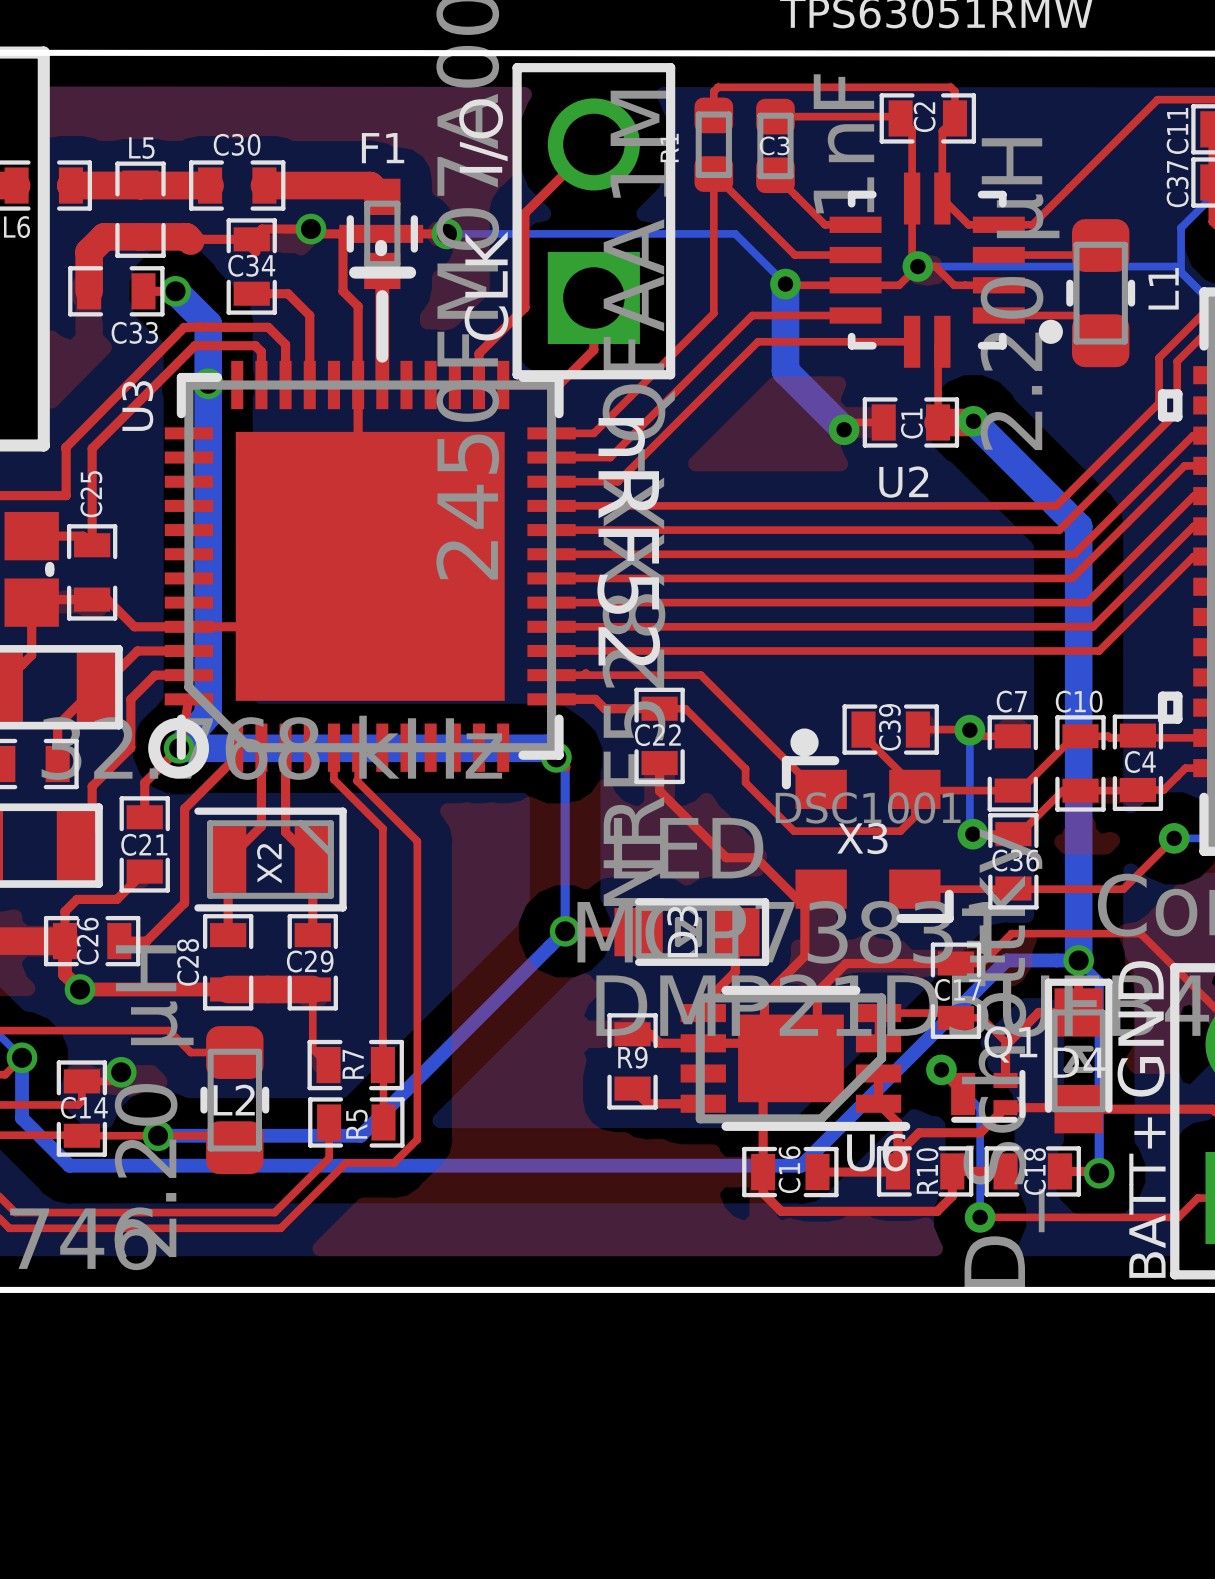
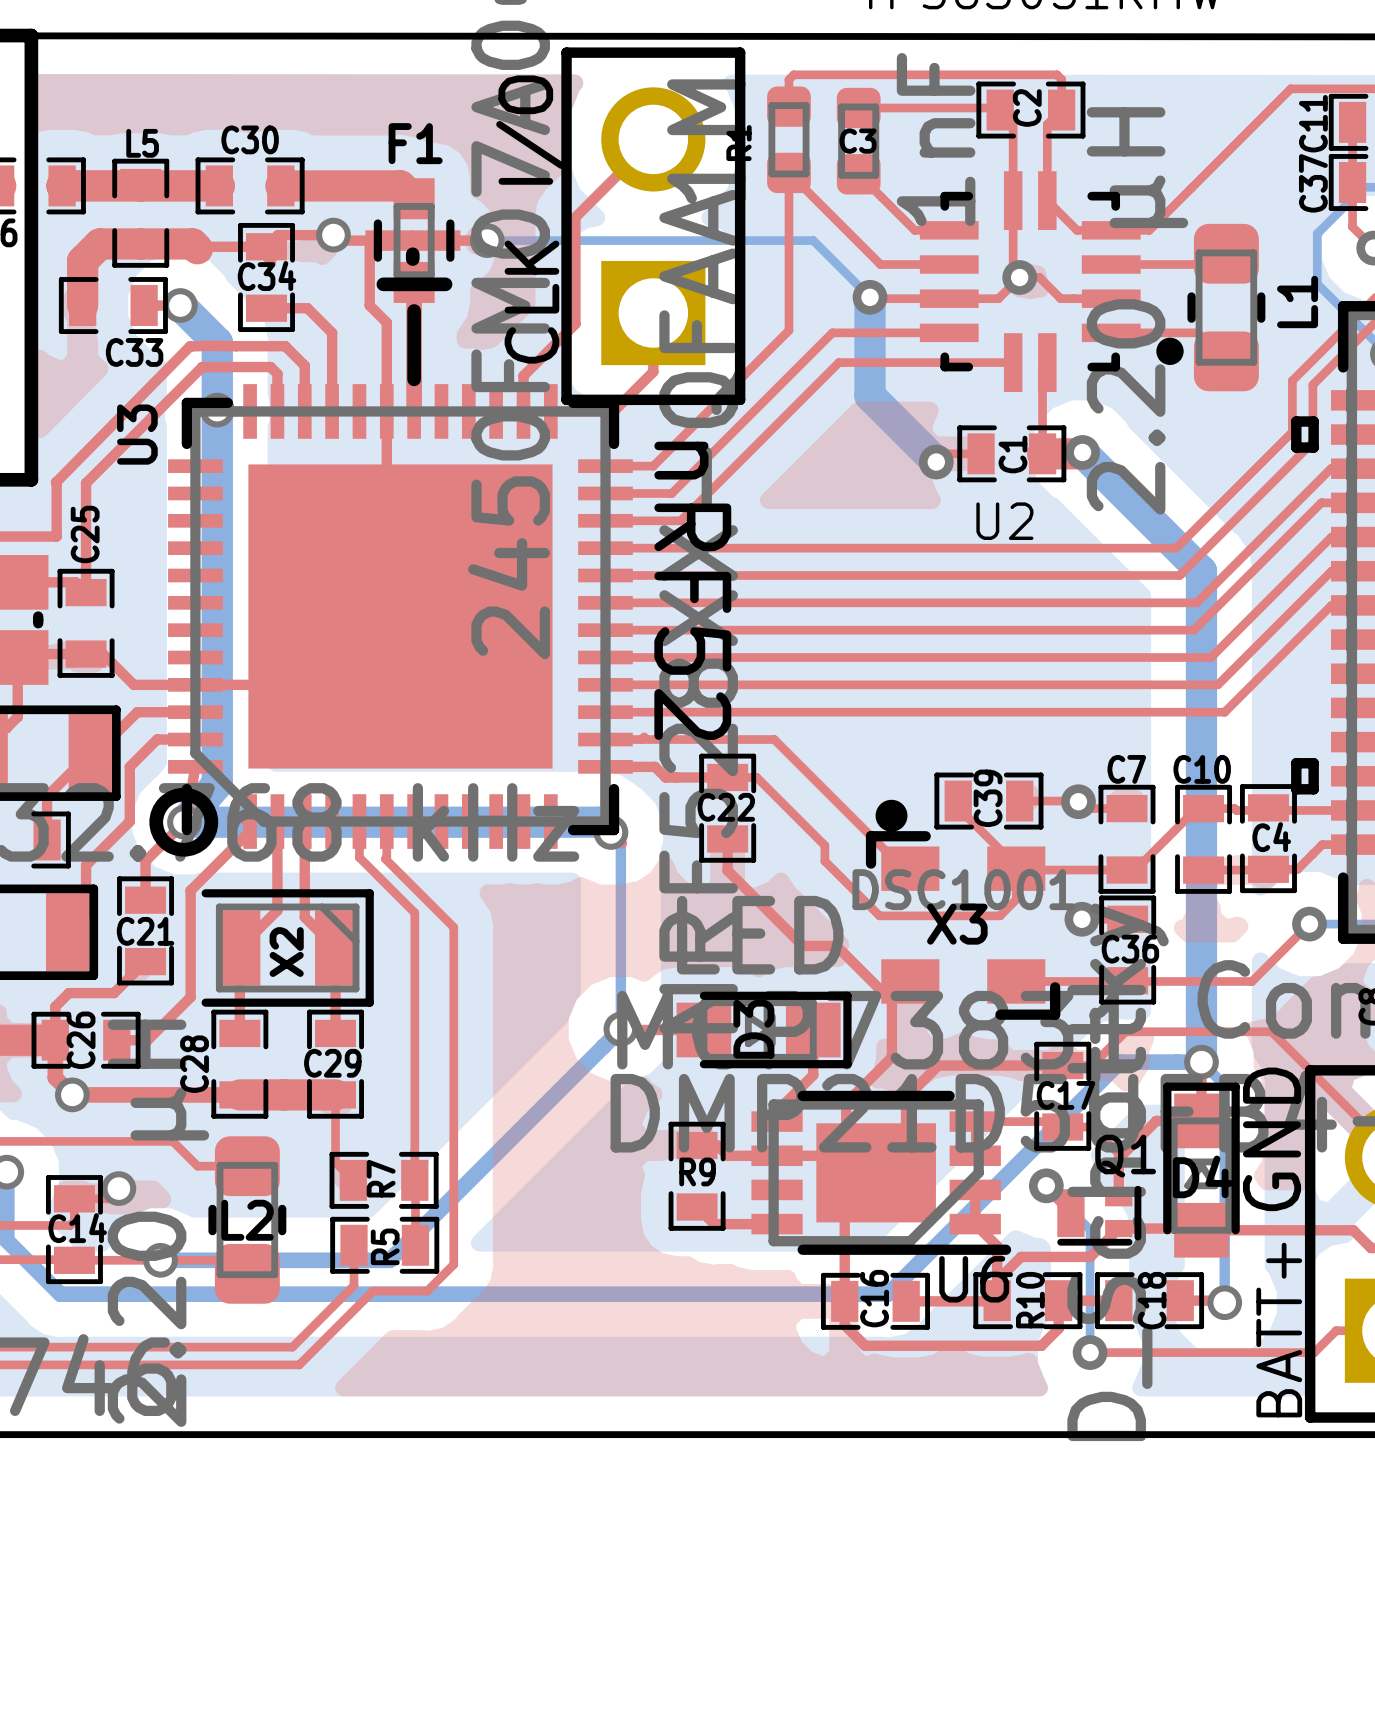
bottom track: (917, 266) (1175, 266) (1181, 272) -> none
bottom track: (969, 730) (969, 831) (972, 834) -> none
top track: (1080, 790) (1062, 790) (1019, 834) (1013, 834) -> none

